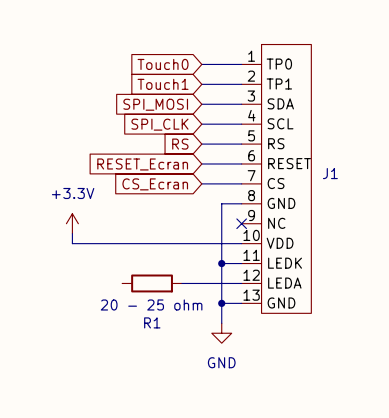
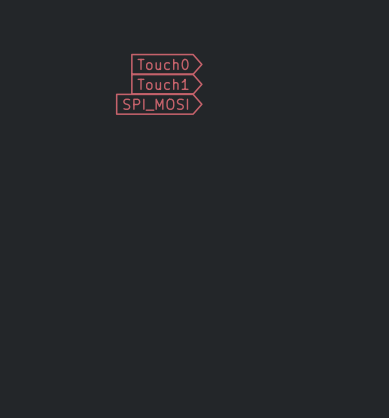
wire: (201, 64) (241, 64) -> none
wire: (201, 84) (241, 84) -> none
wire: (201, 104) (241, 104) -> none
global label: SPI_CLK (159, 124) -> none
wire: (201, 124) (241, 124) -> none
global label: RS (180, 144) -> none
wire: (201, 144) (241, 144) -> none
wire: (201, 163) (241, 163) -> none
global label: RESET_Ecran (142, 164) -> none
J1: (276, 178) -> none
wire: (201, 183) (241, 183) -> none
global label: CS_Ecran (155, 184) -> none
wire: (241, 203) (221, 203) (221, 323) -> none
power symbol: +3.3V (72, 223) -> none
no-connect mark: (241, 223) -> none
wire: (72, 233) (72, 243) (241, 243) -> none
wire: (221, 263) (241, 263) -> none
junction: (221, 263) -> none
R1: 20 - 25 ohm (152, 283) -> none
wire: (181, 283) (241, 283) -> none
wire: (221, 303) (241, 303) -> none
junction: (221, 303) -> none
power symbol: GND (221, 333) -> none

